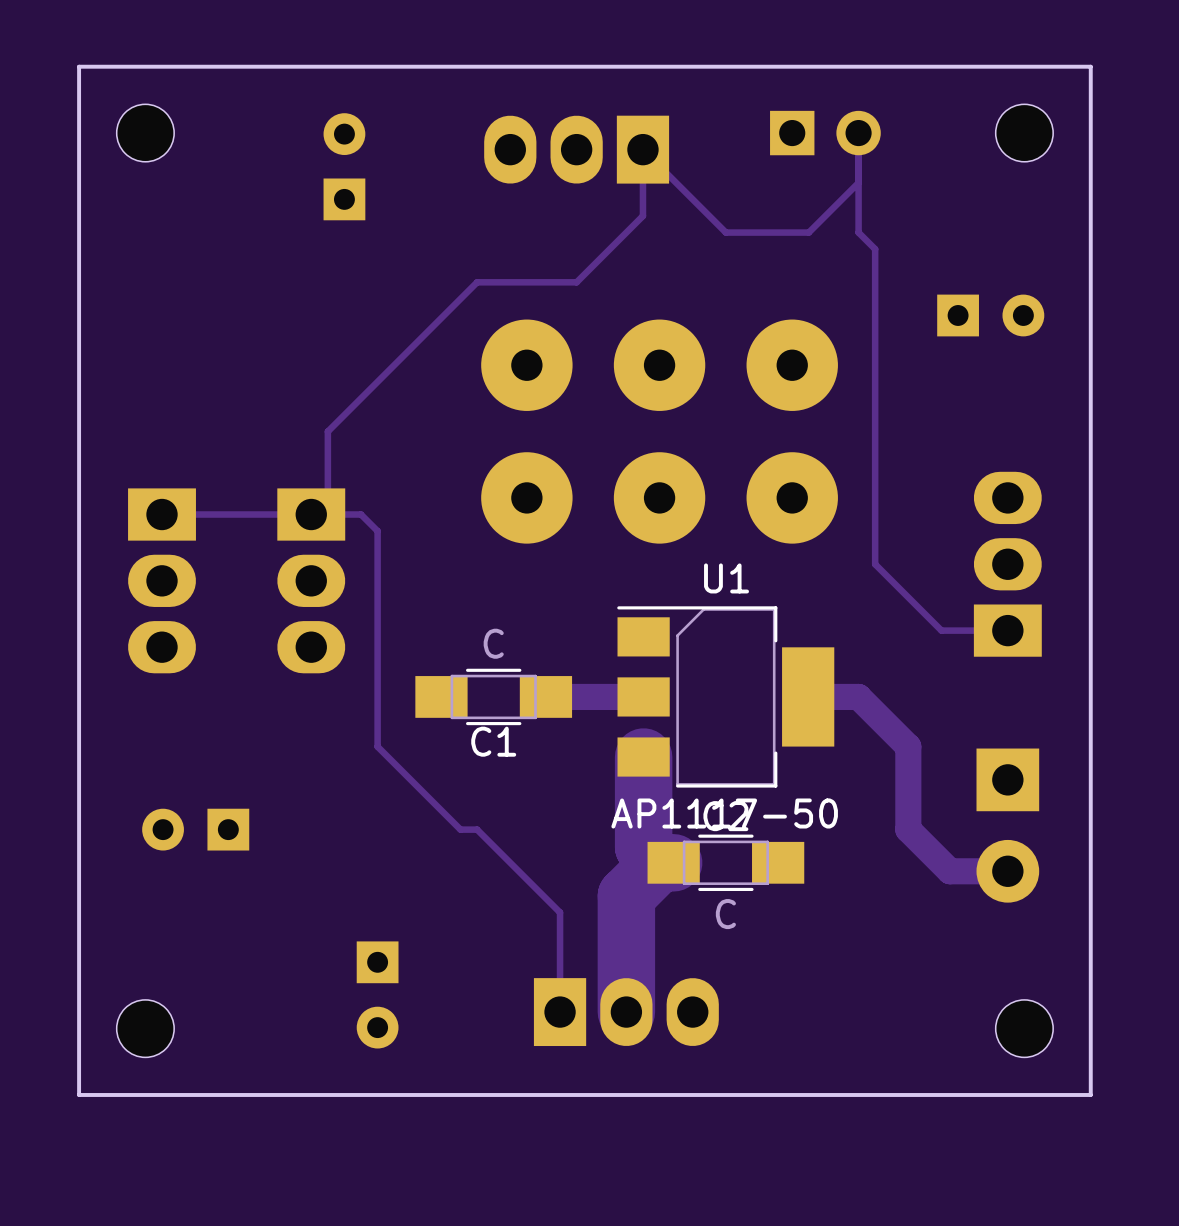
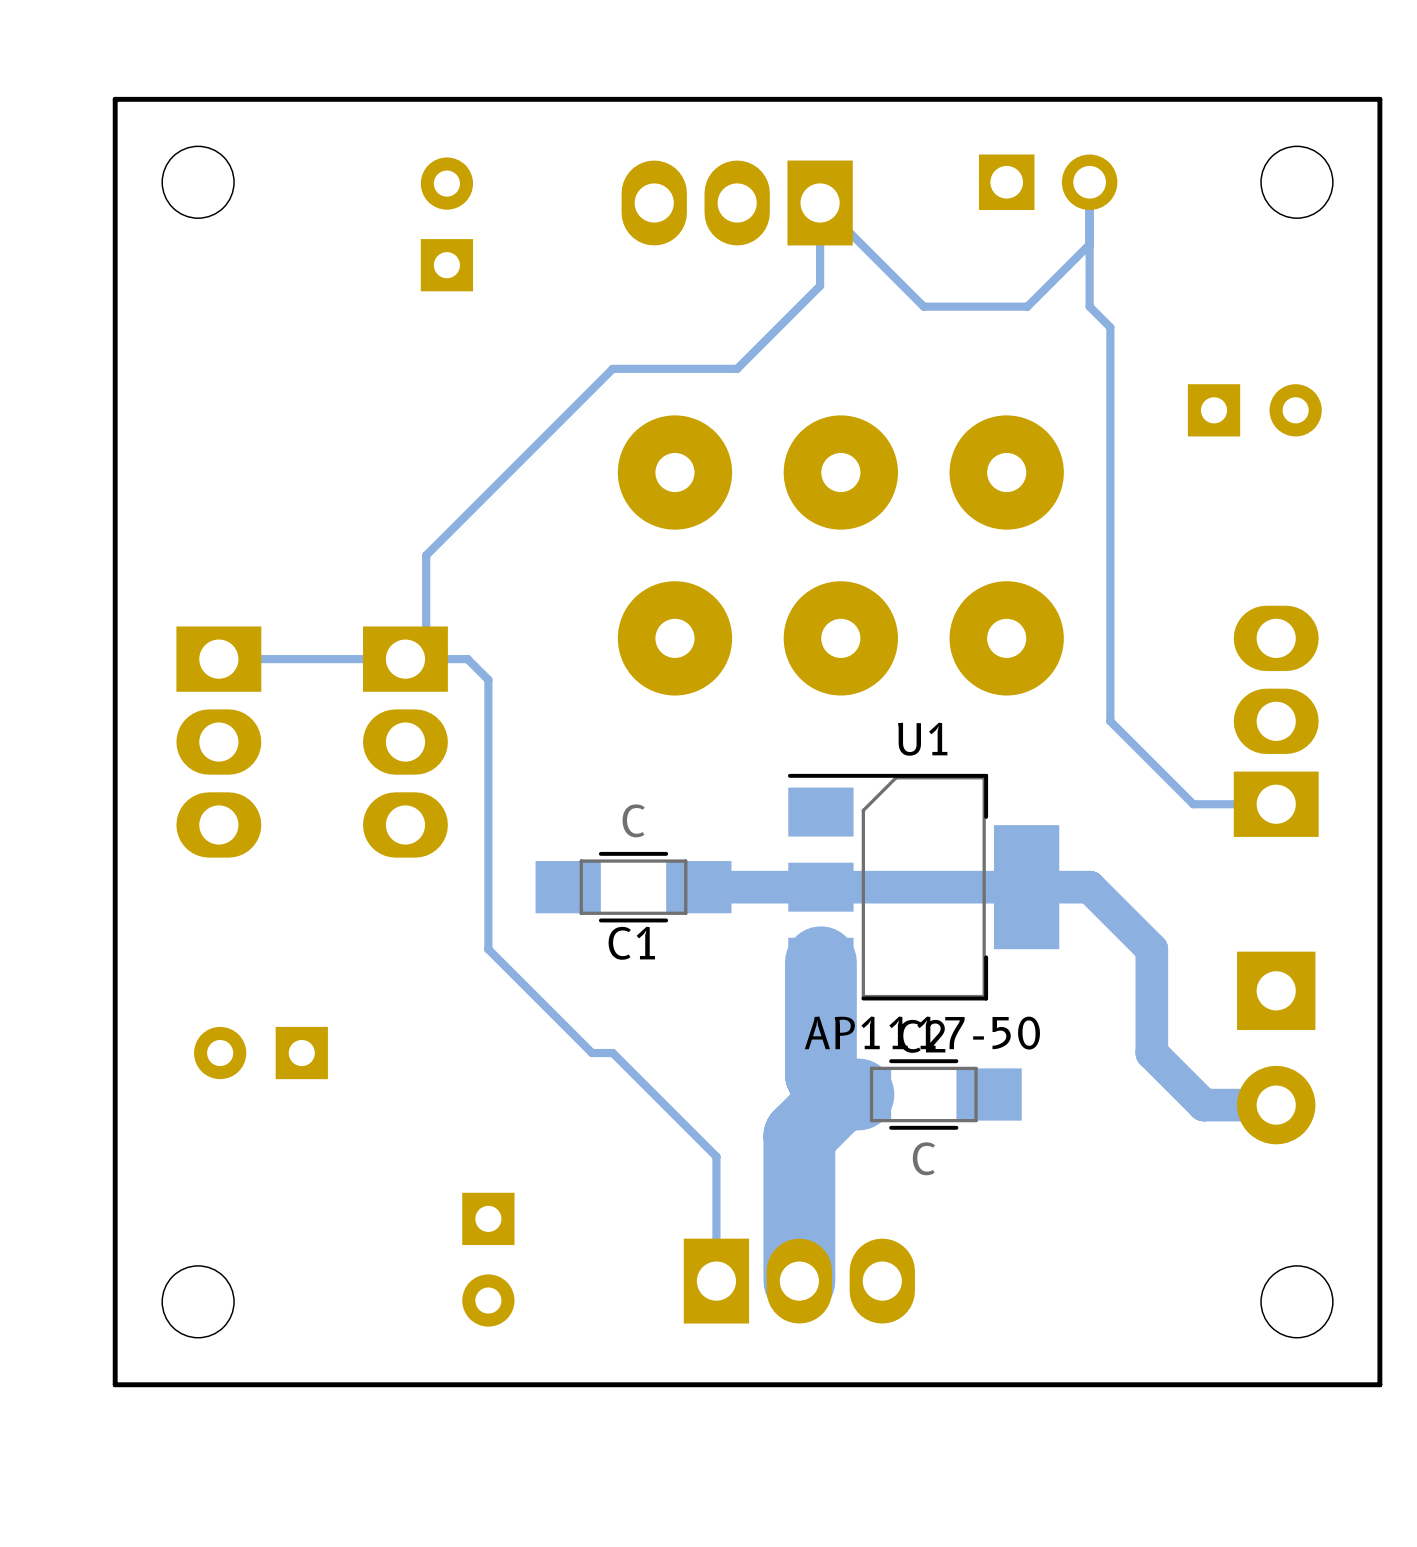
track: none -> (1026, 887) (820, 887)

